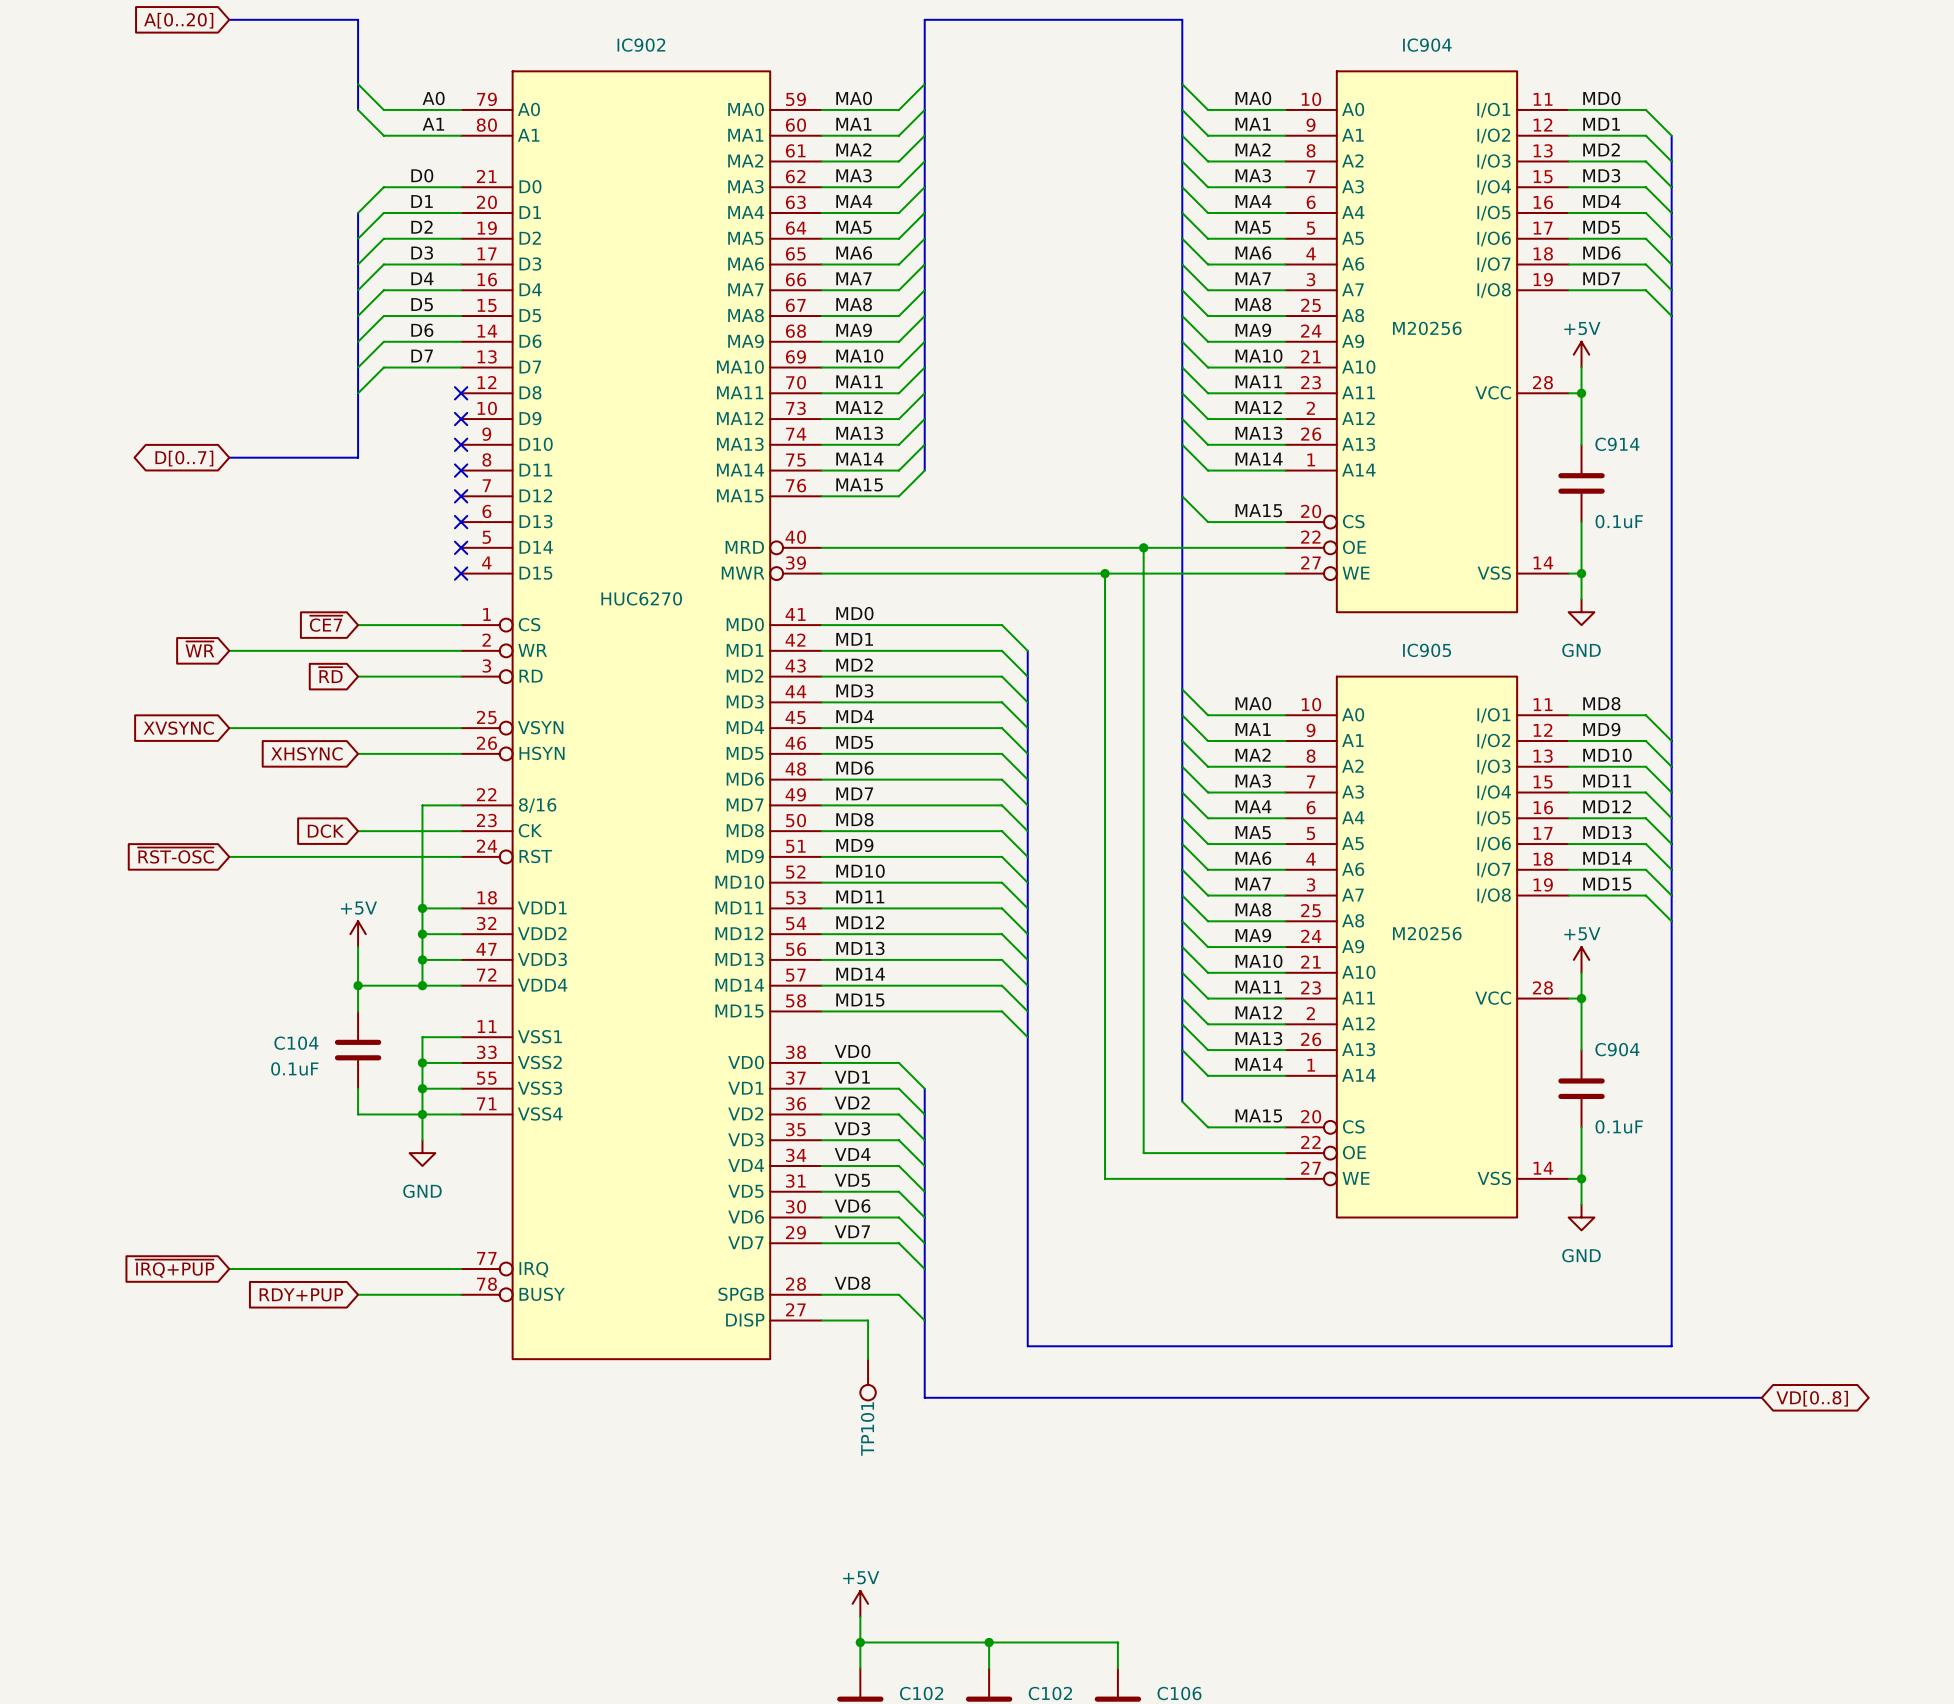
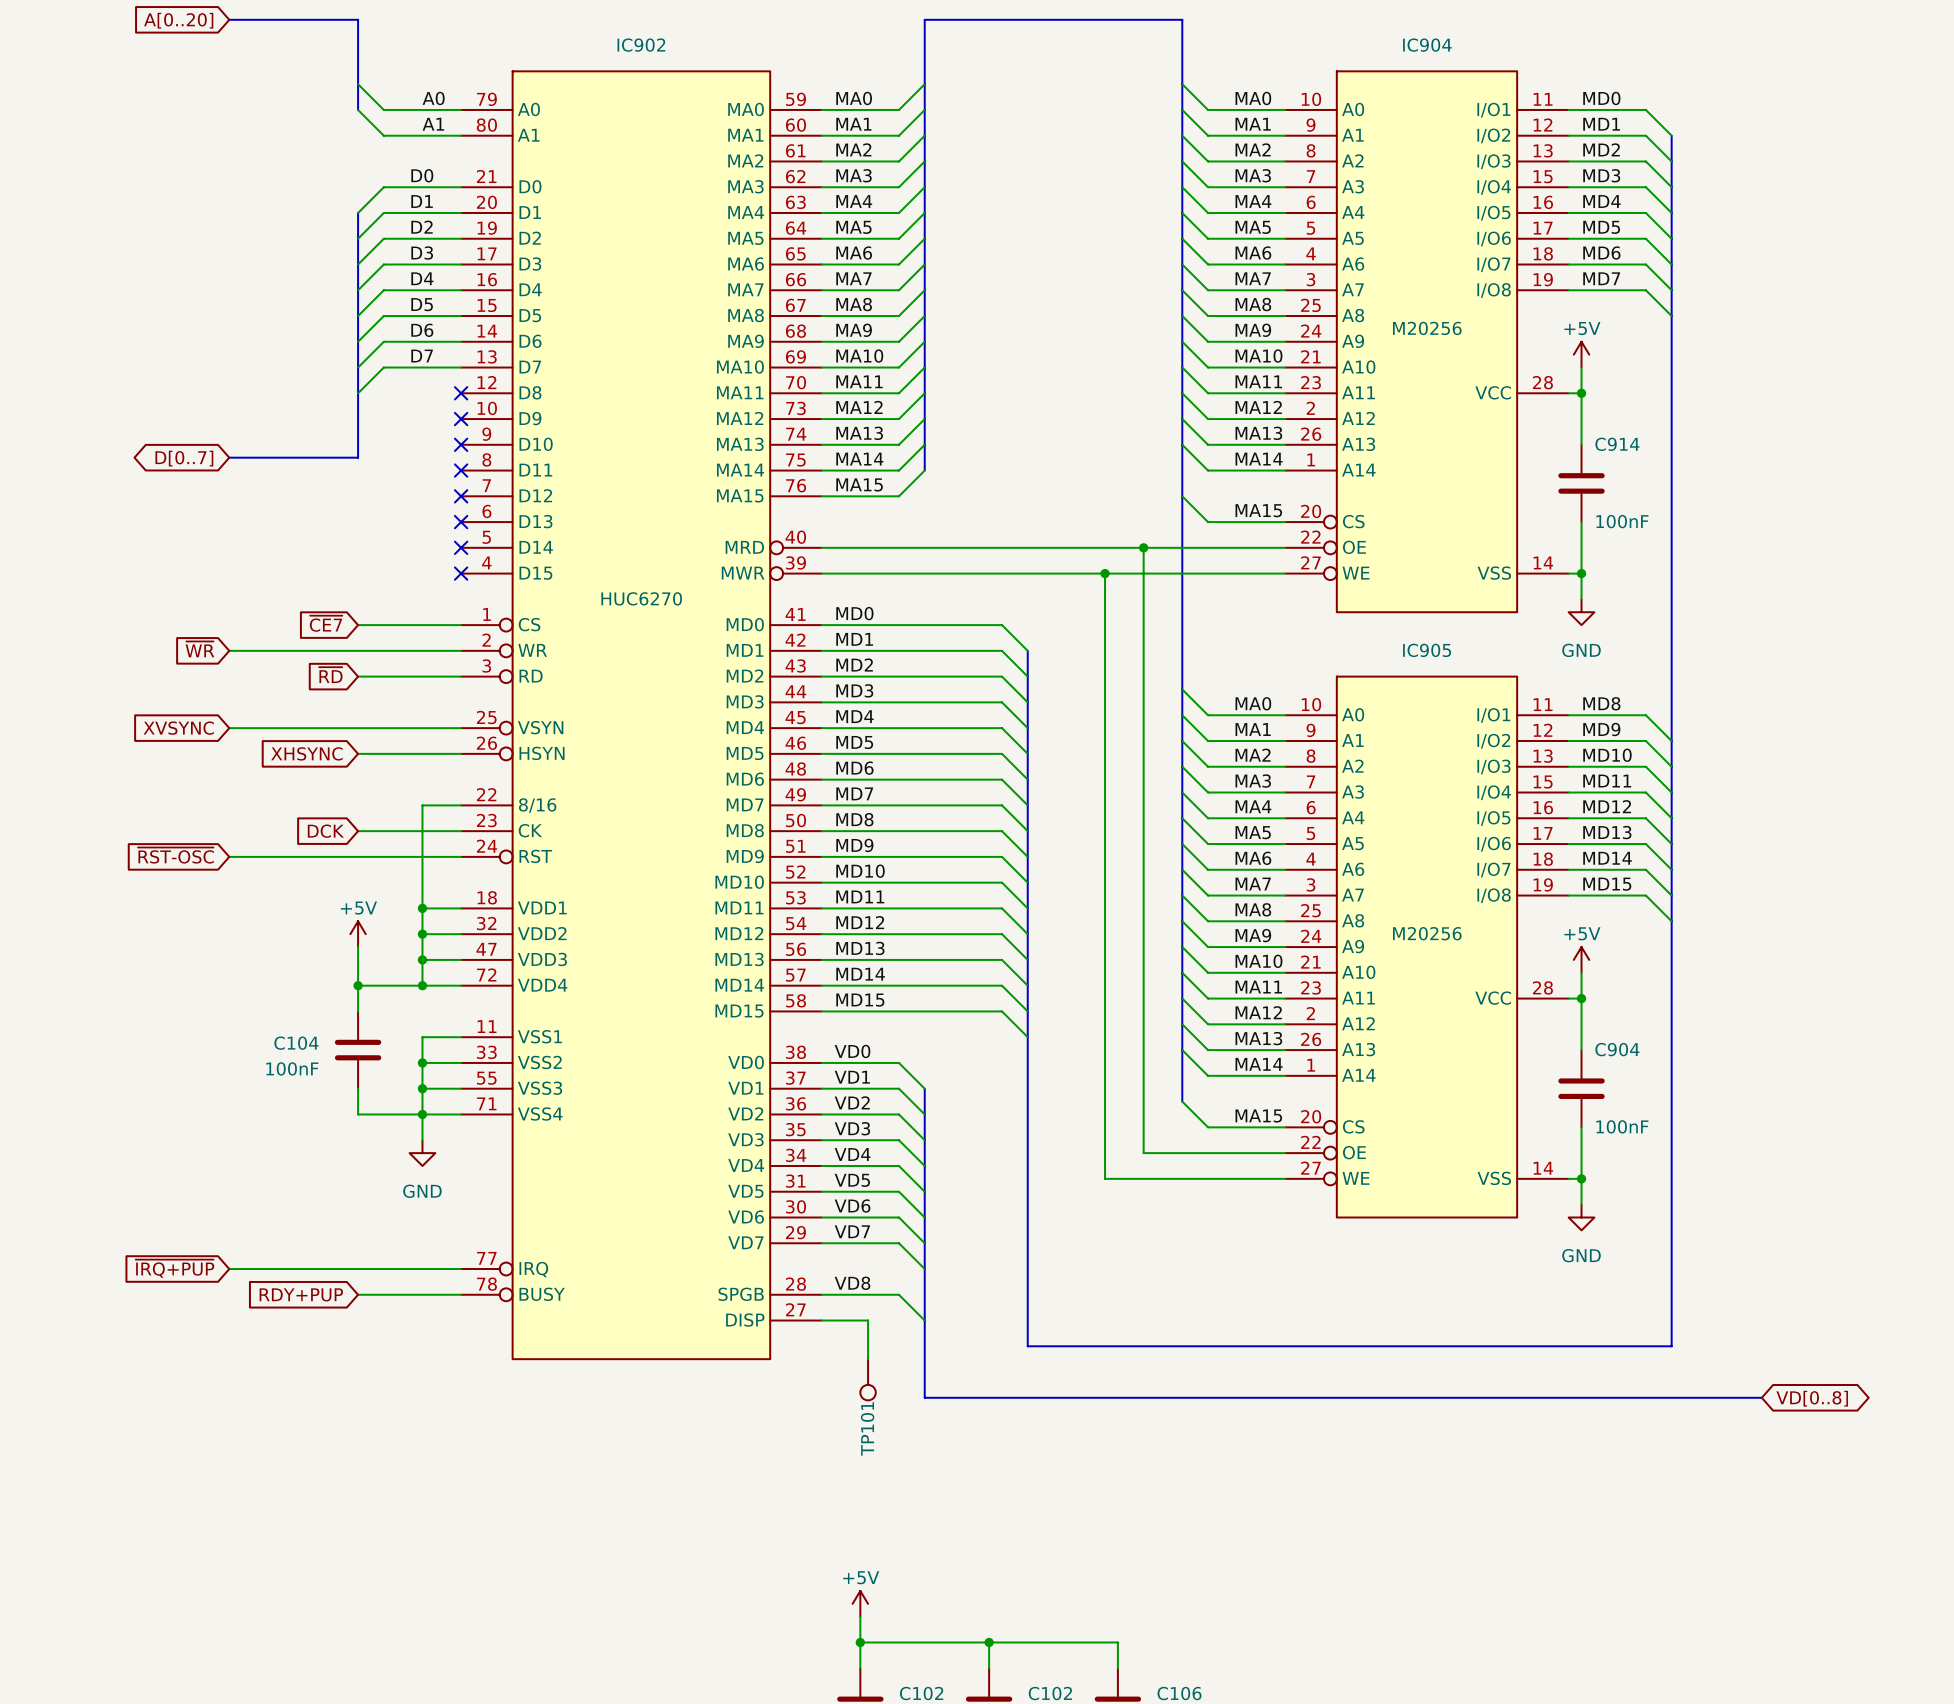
C914 value: 0.1uF (1619, 521) -> 100nF (1622, 521)
C104 value: 0.1uF (294, 1068) -> 100nF (292, 1068)
C904 value: 0.1uF (1619, 1126) -> 100nF (1622, 1126)

